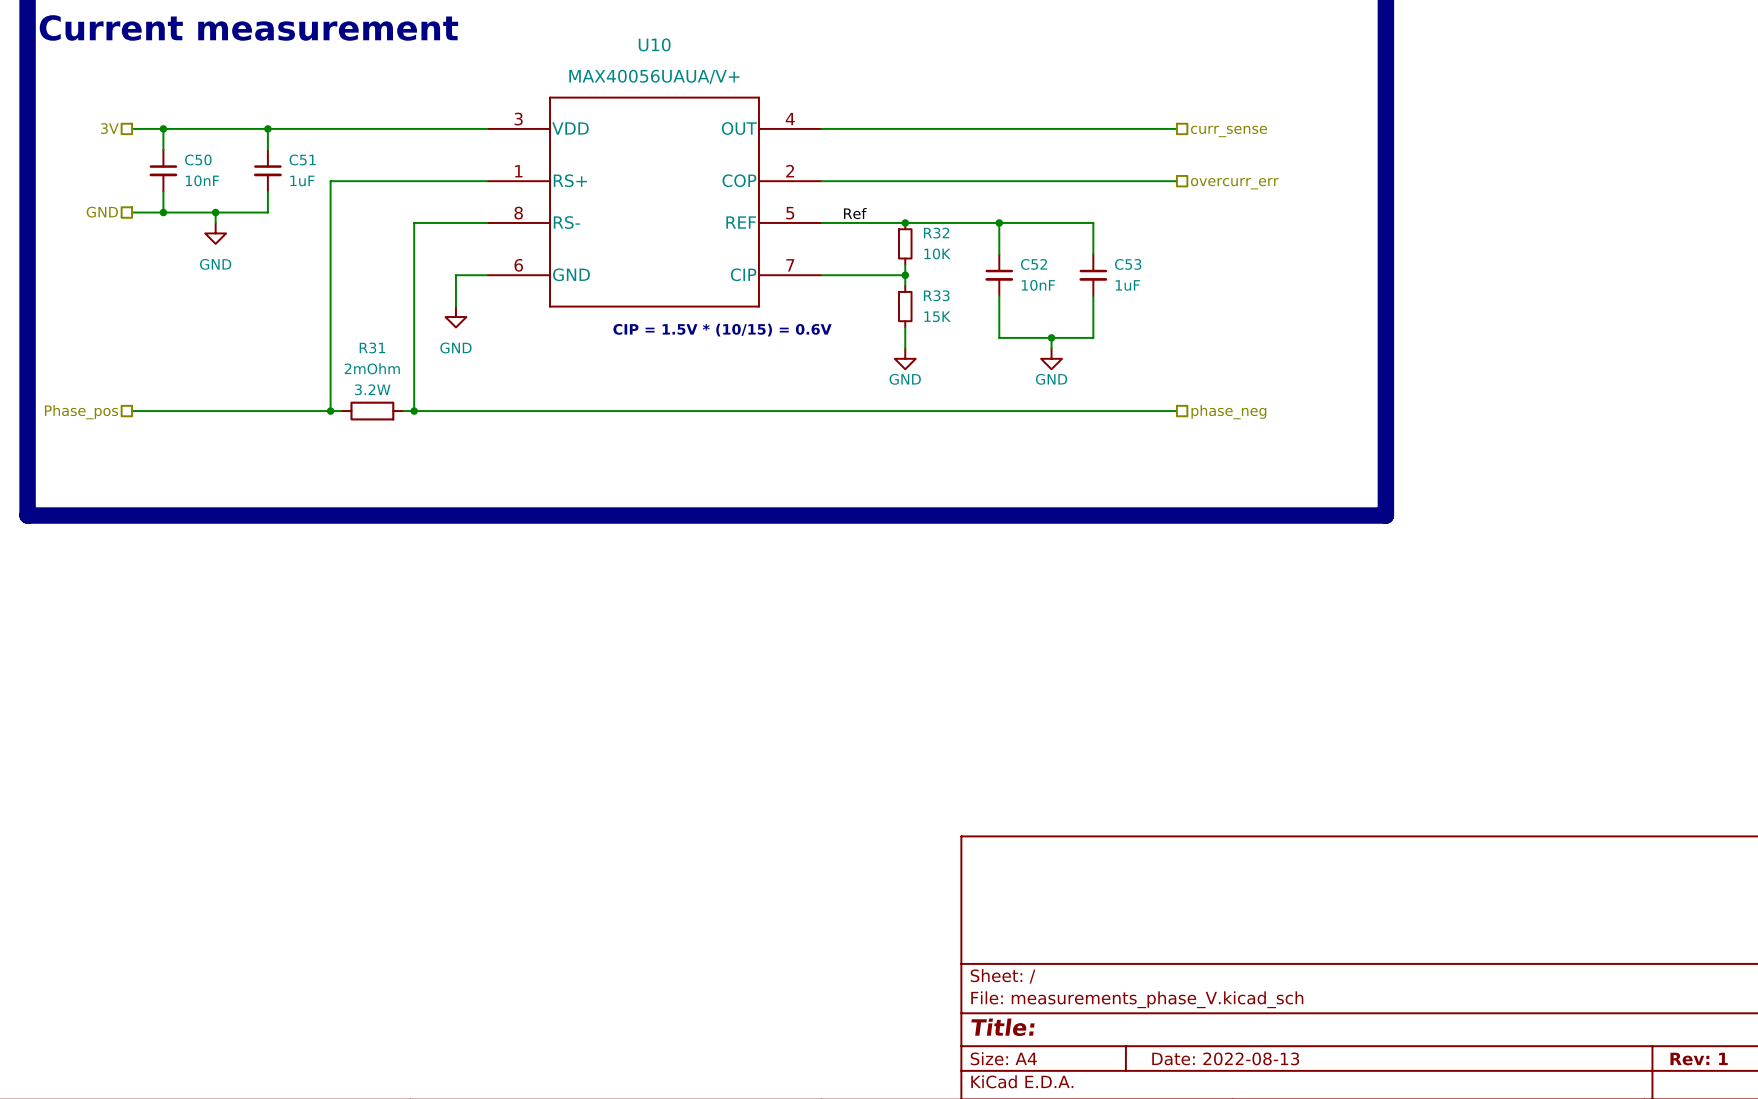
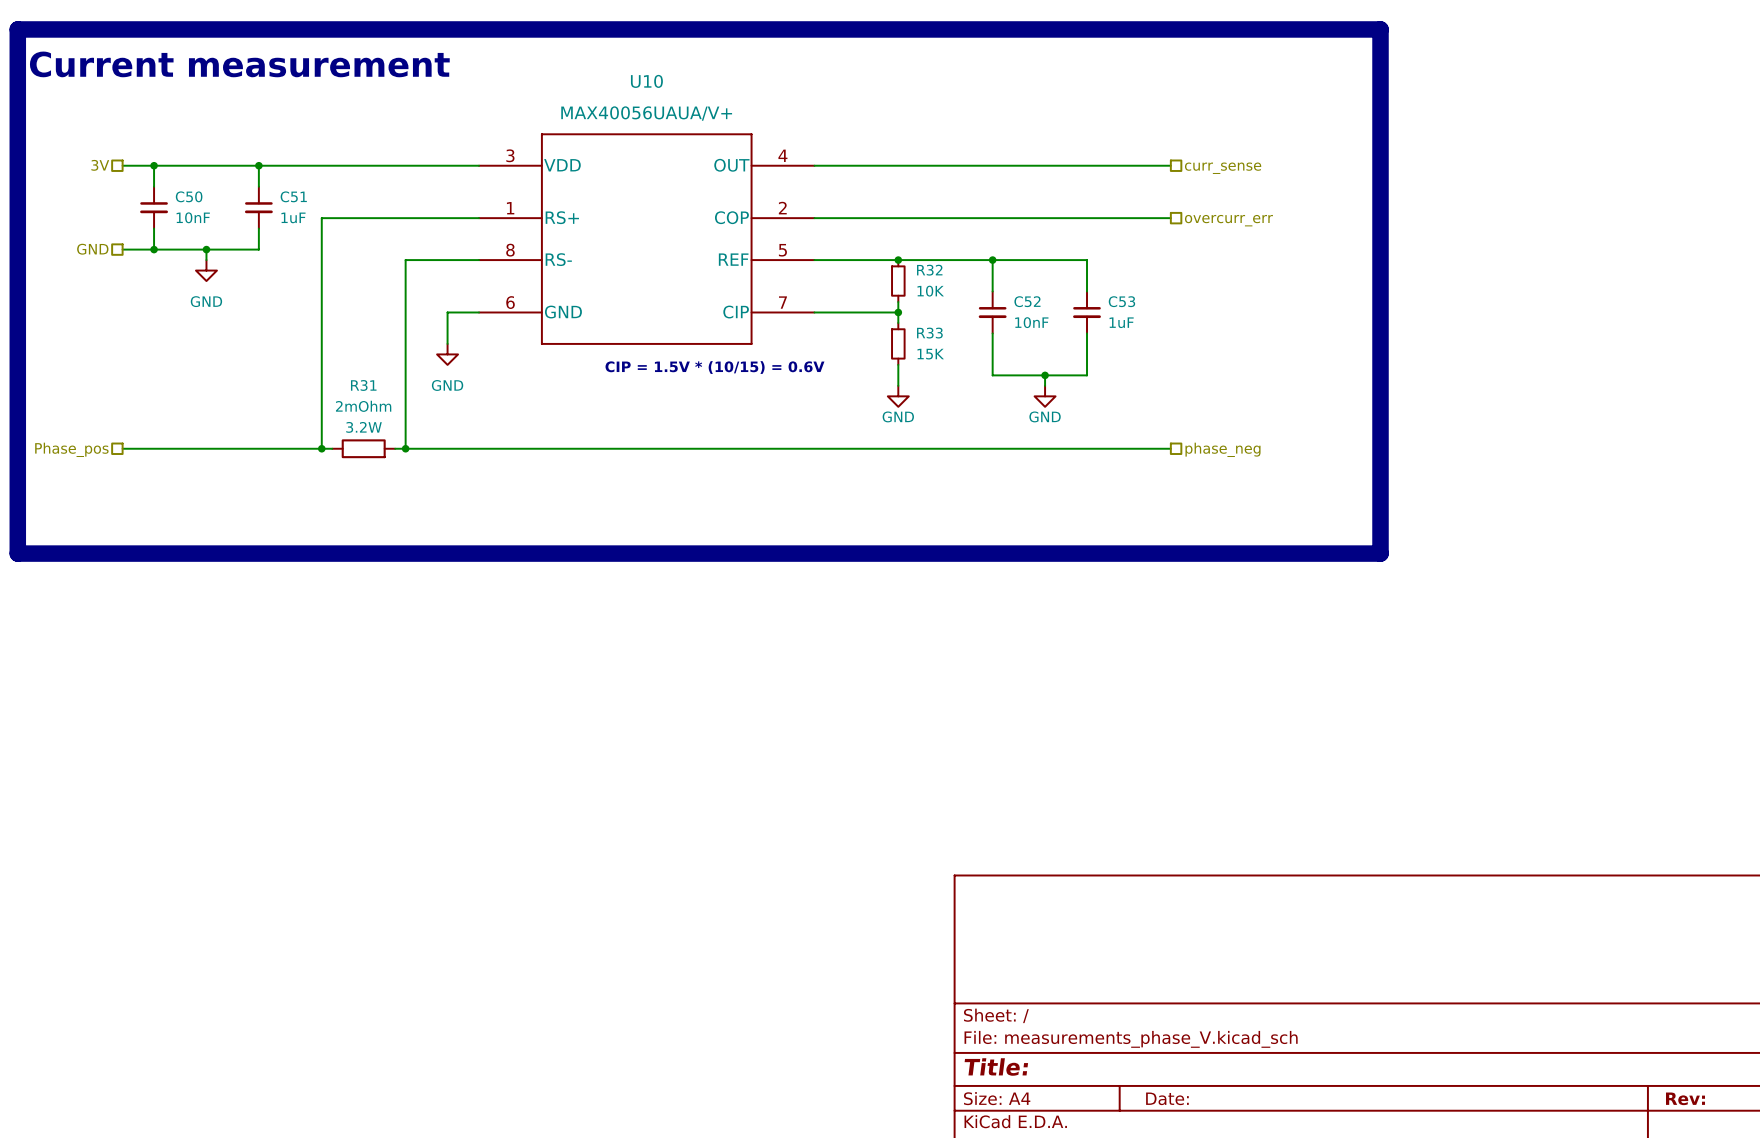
label: Ref (855, 213) -> none
title block: Date: 2022-08-13 (1225, 1058) -> Date: (1167, 1098)
title block: Rev: 1 (1699, 1059) -> Rev: (1685, 1098)

